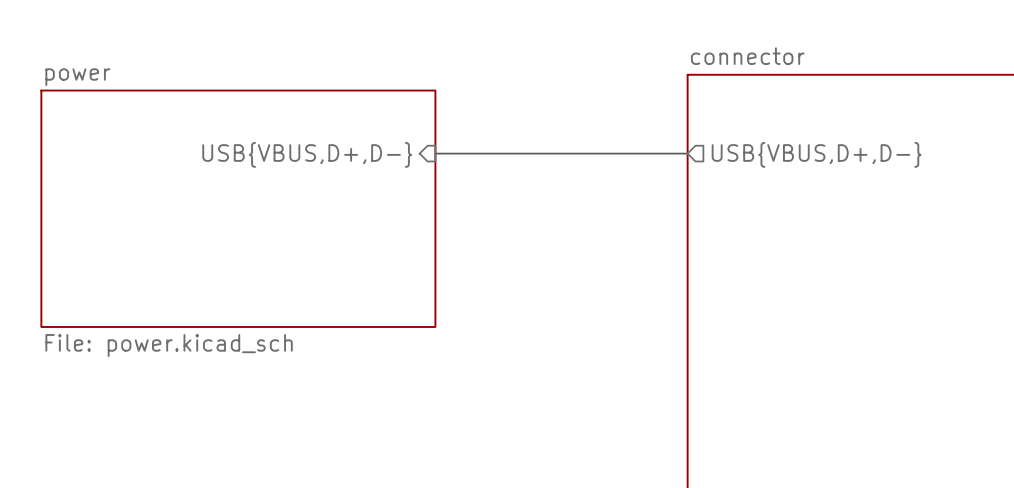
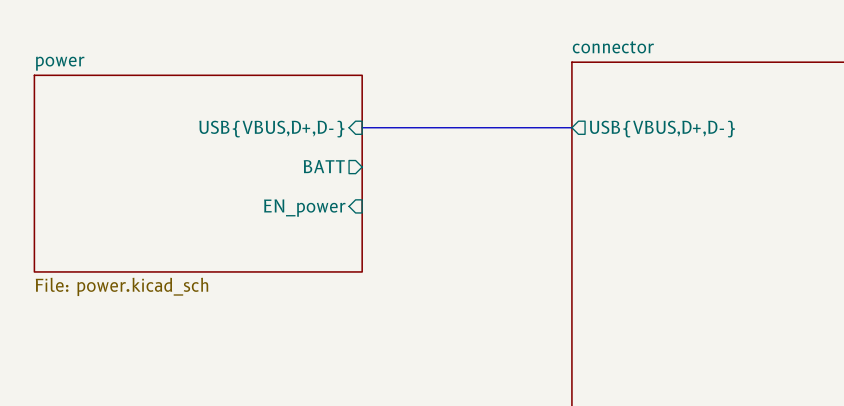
sheet pin: none -> BATT (324, 166)
sheet pin: none -> EN_power (304, 208)

